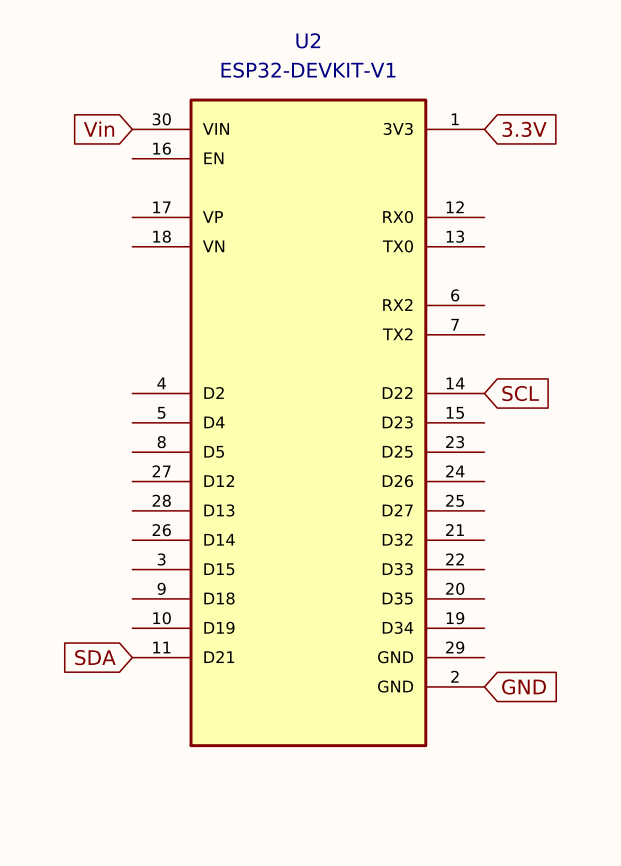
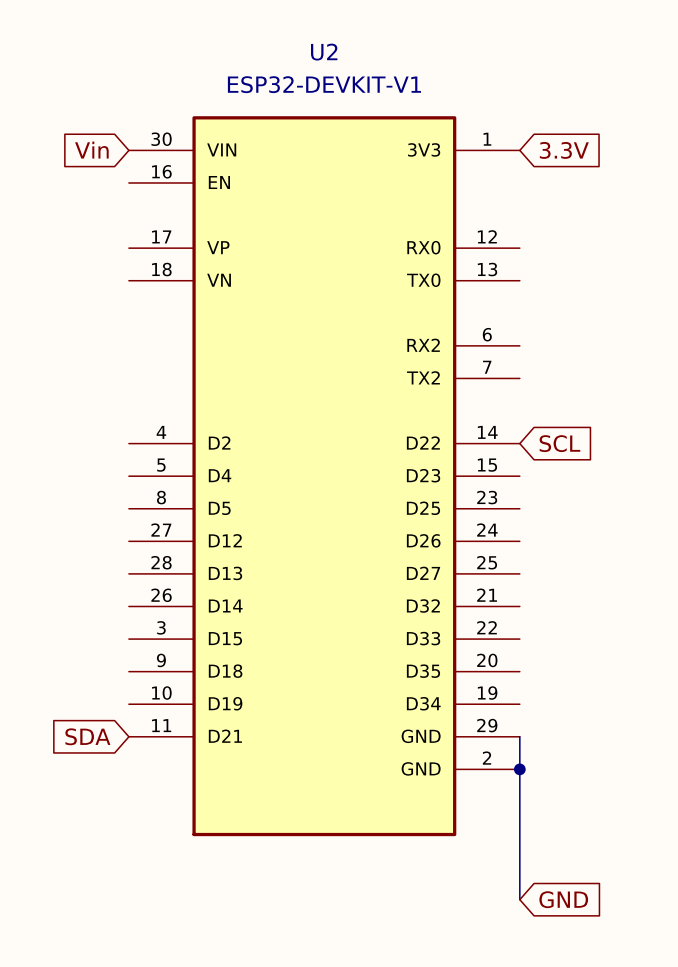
wire: none -> (519, 736) (519, 899)
junction: none -> (519, 769)
global label position: GND (524, 686) -> GND (563, 899)

